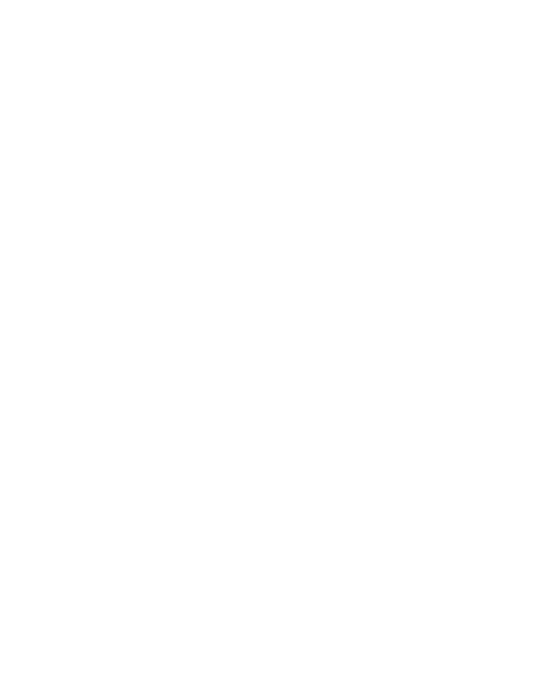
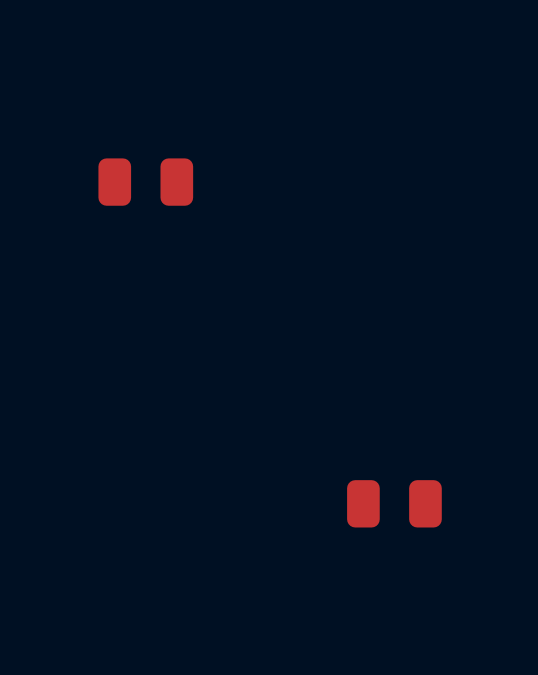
part: none -> (145, 182)
part: none -> (394, 503)

